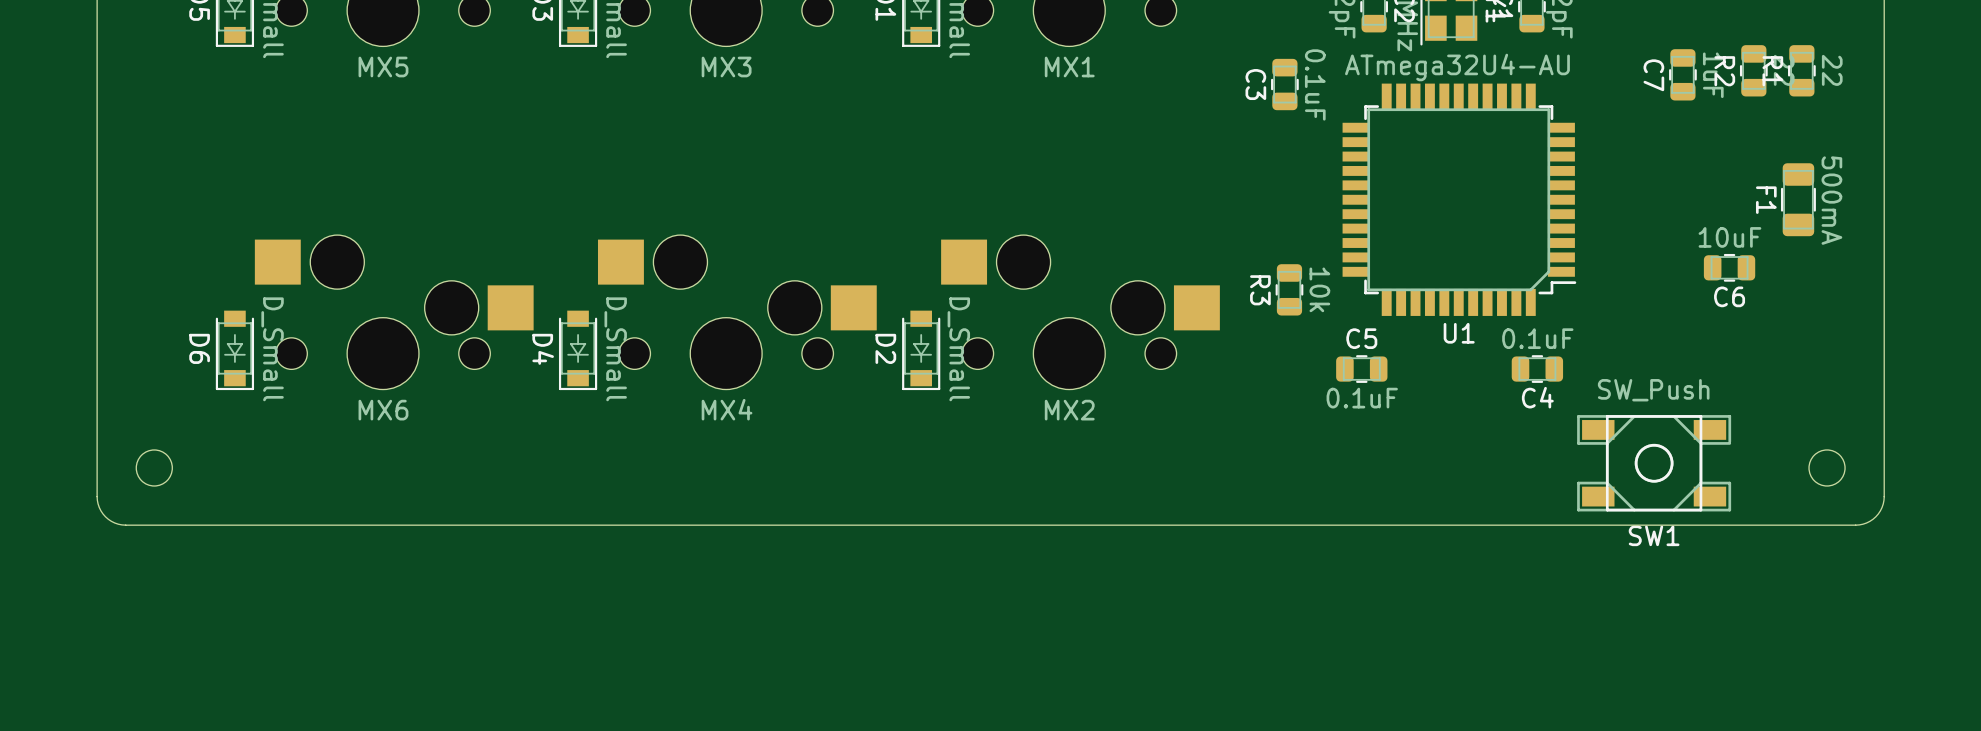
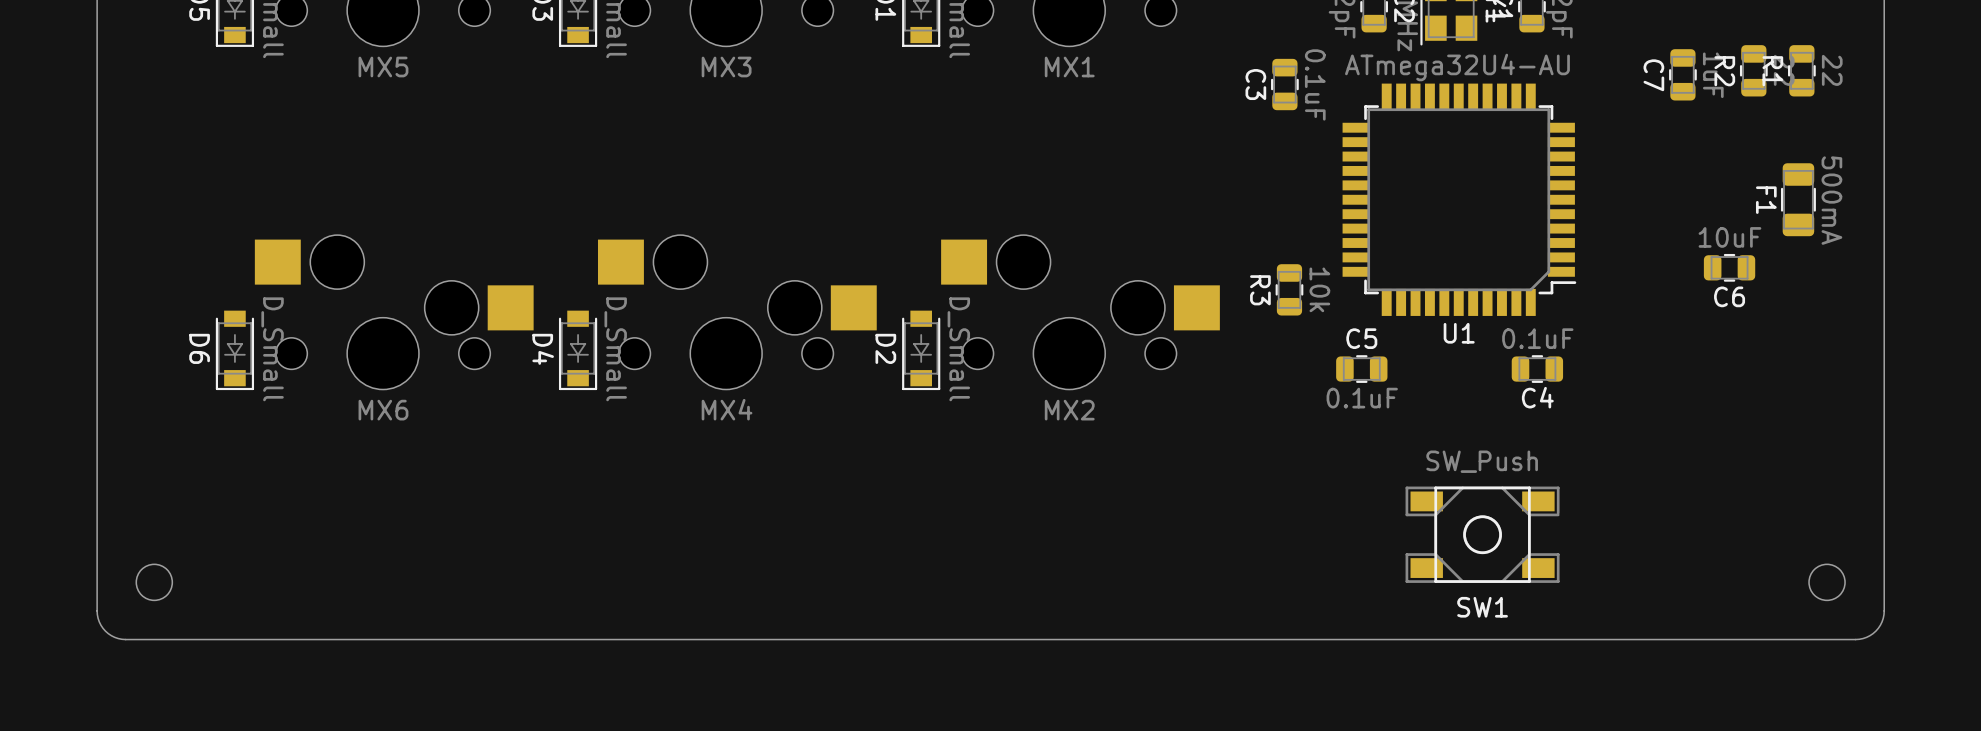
SW1 position: (1654, 463) -> (1482, 534)
round board edge position: (154, 467) -> (154, 582)
round board edge position: (1827, 467) -> (1827, 582)
board edge: (1884, 496) (1882, 507) (1875, 516) (1866, 522) (1855, 525) (125, 525) (114, 522) (105, 516) (99, 507) (97, 496) -> (1884, 496) (1883, 614) (1875, 631) (1859, 639) (125, 639) (108, 633) (98, 618) (97, 496)

